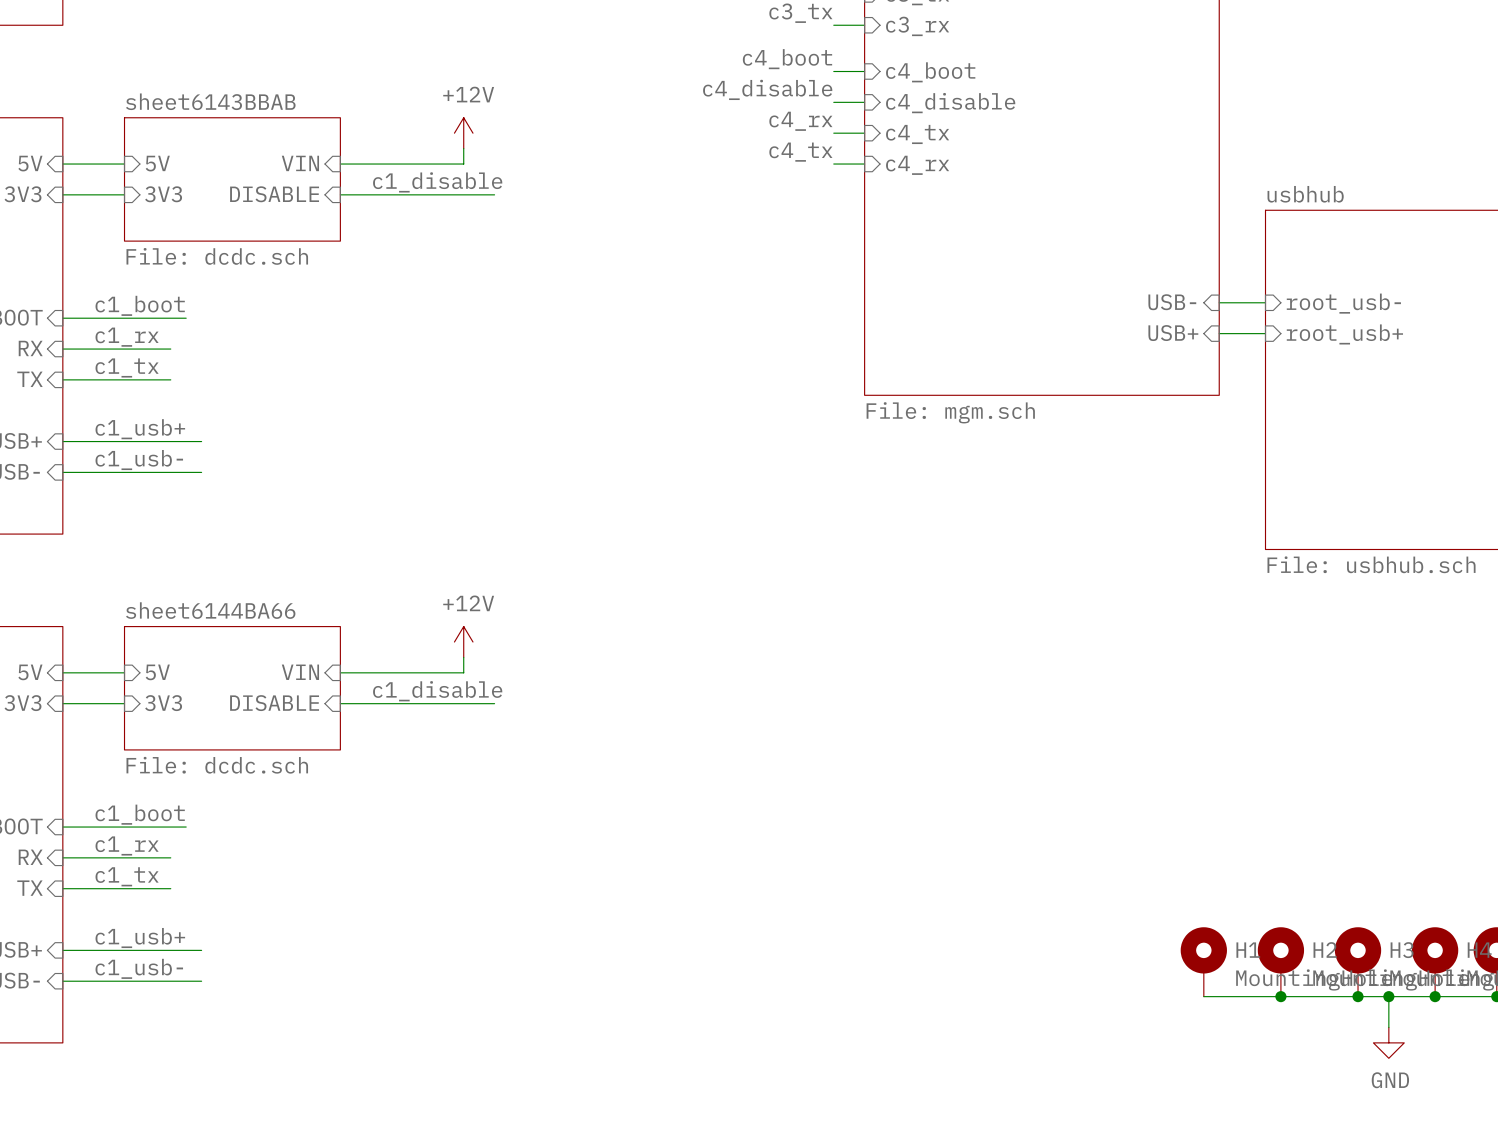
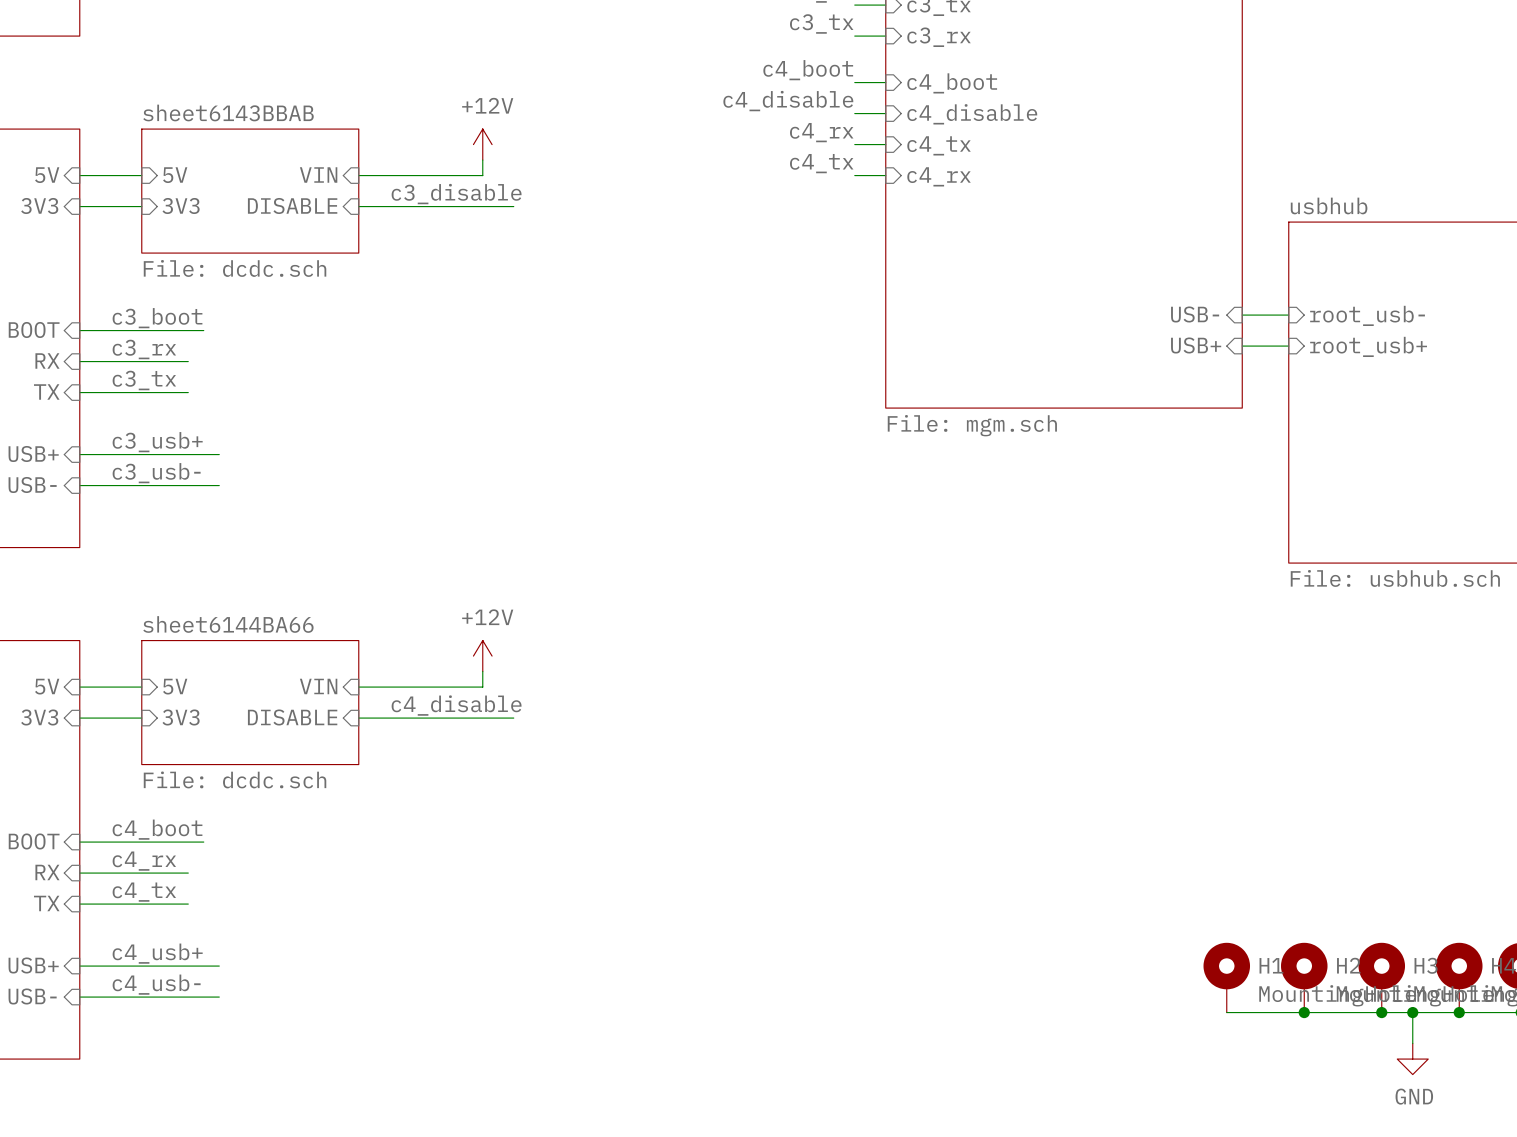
label: c1_disable (437, 182) -> c3_disable (456, 194)
label: c1_boot (140, 305) -> c3_boot (157, 318)
label: c1_rx (127, 337) -> c3_rx (144, 349)
label: c1_tx (127, 367) -> c3_tx (144, 380)
label: c1_usb+ (140, 429) -> c3_usb+ (157, 442)
label: c1_usb- (139, 460) -> c3_usb- (156, 473)
label: c1_disable (437, 691) -> c4_disable (456, 705)
label: c1_boot (140, 814) -> c4_boot (157, 829)
label: c1_rx (127, 845) -> c4_rx (144, 861)
label: c1_tx (127, 876) -> c4_tx (144, 892)
label: c1_usb+ (140, 938) -> c4_usb+ (157, 953)
label: c1_usb- (139, 968) -> c4_usb- (156, 984)

